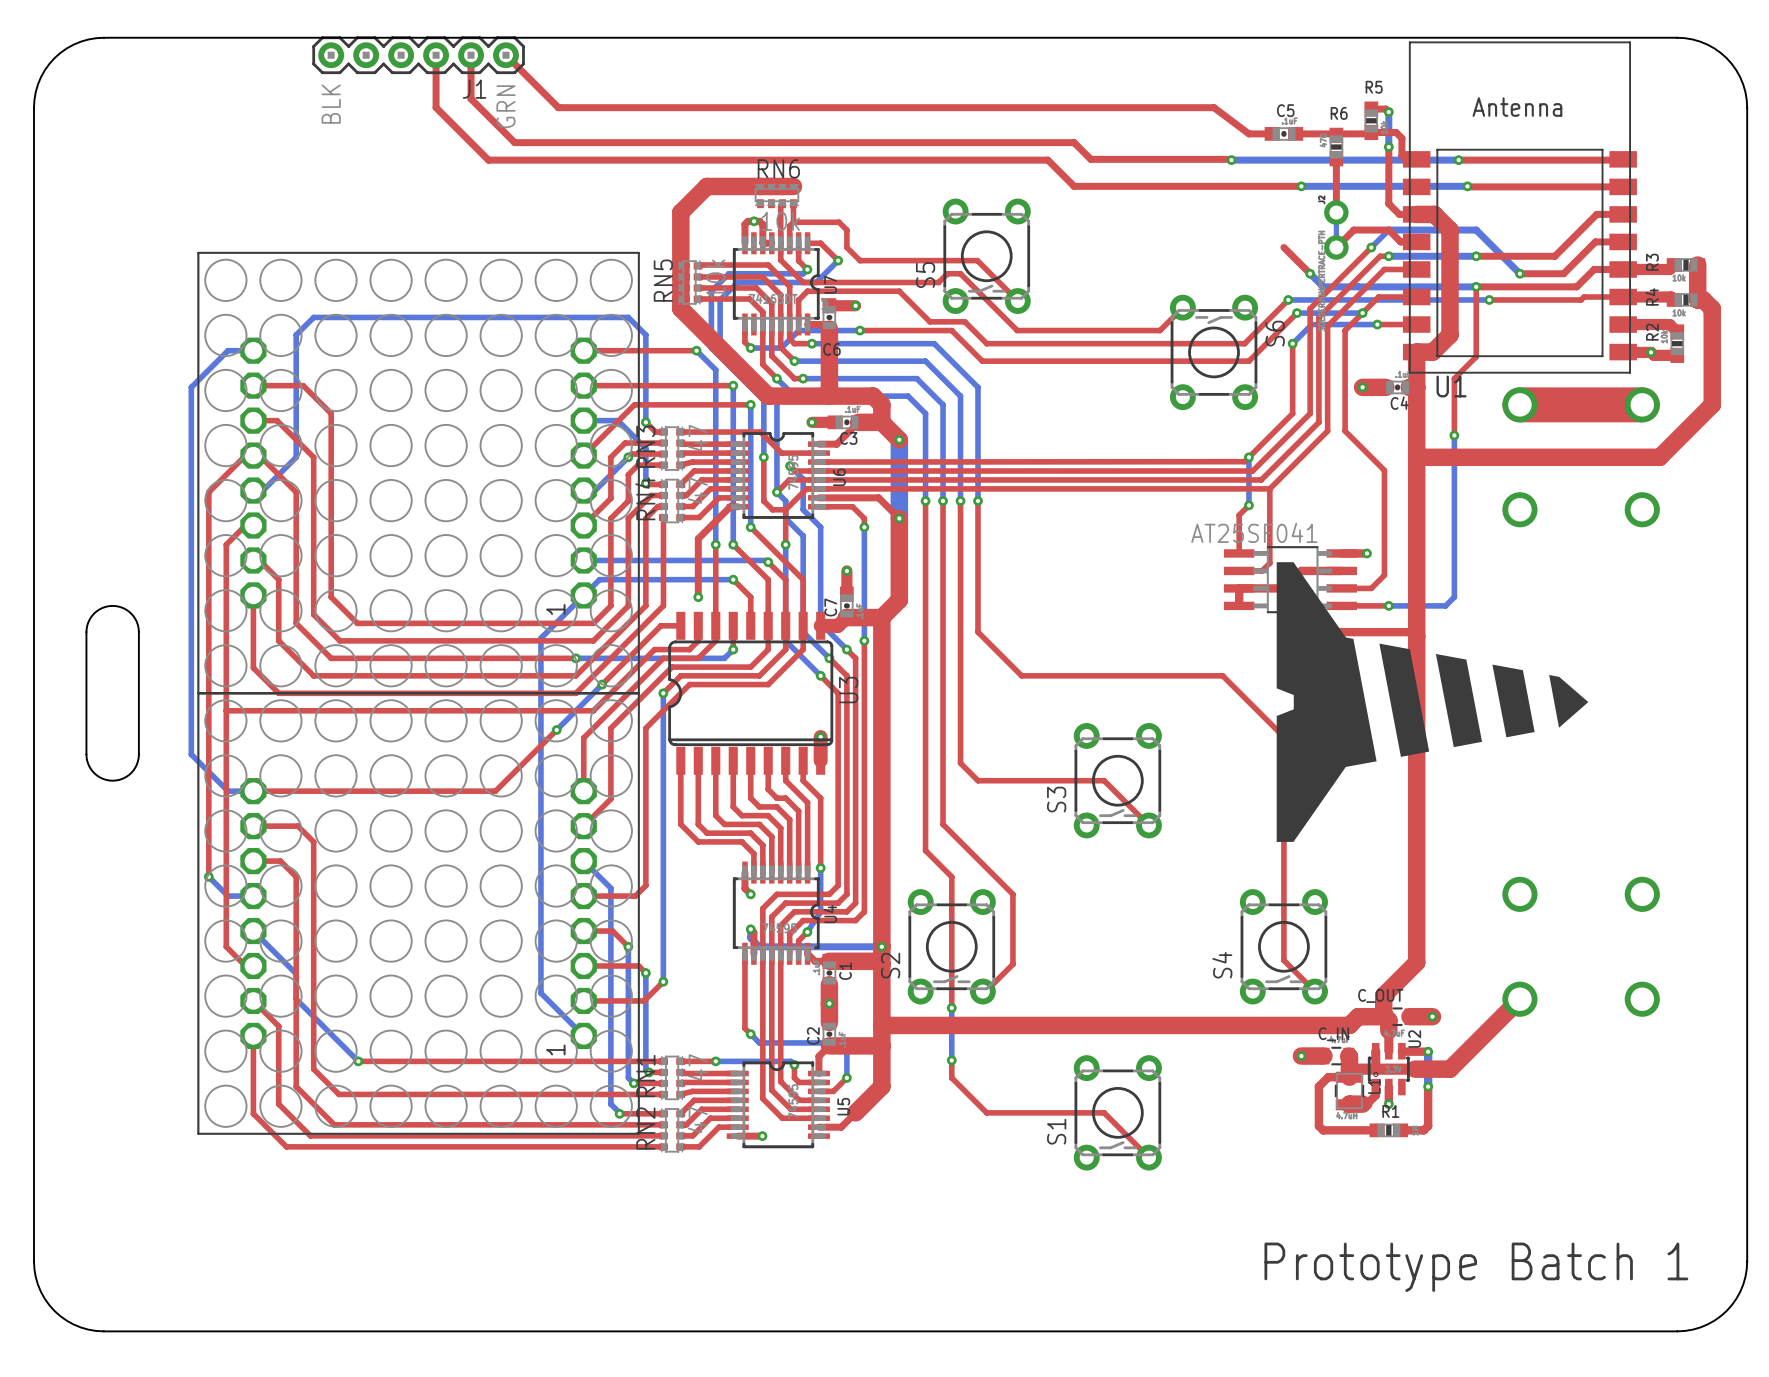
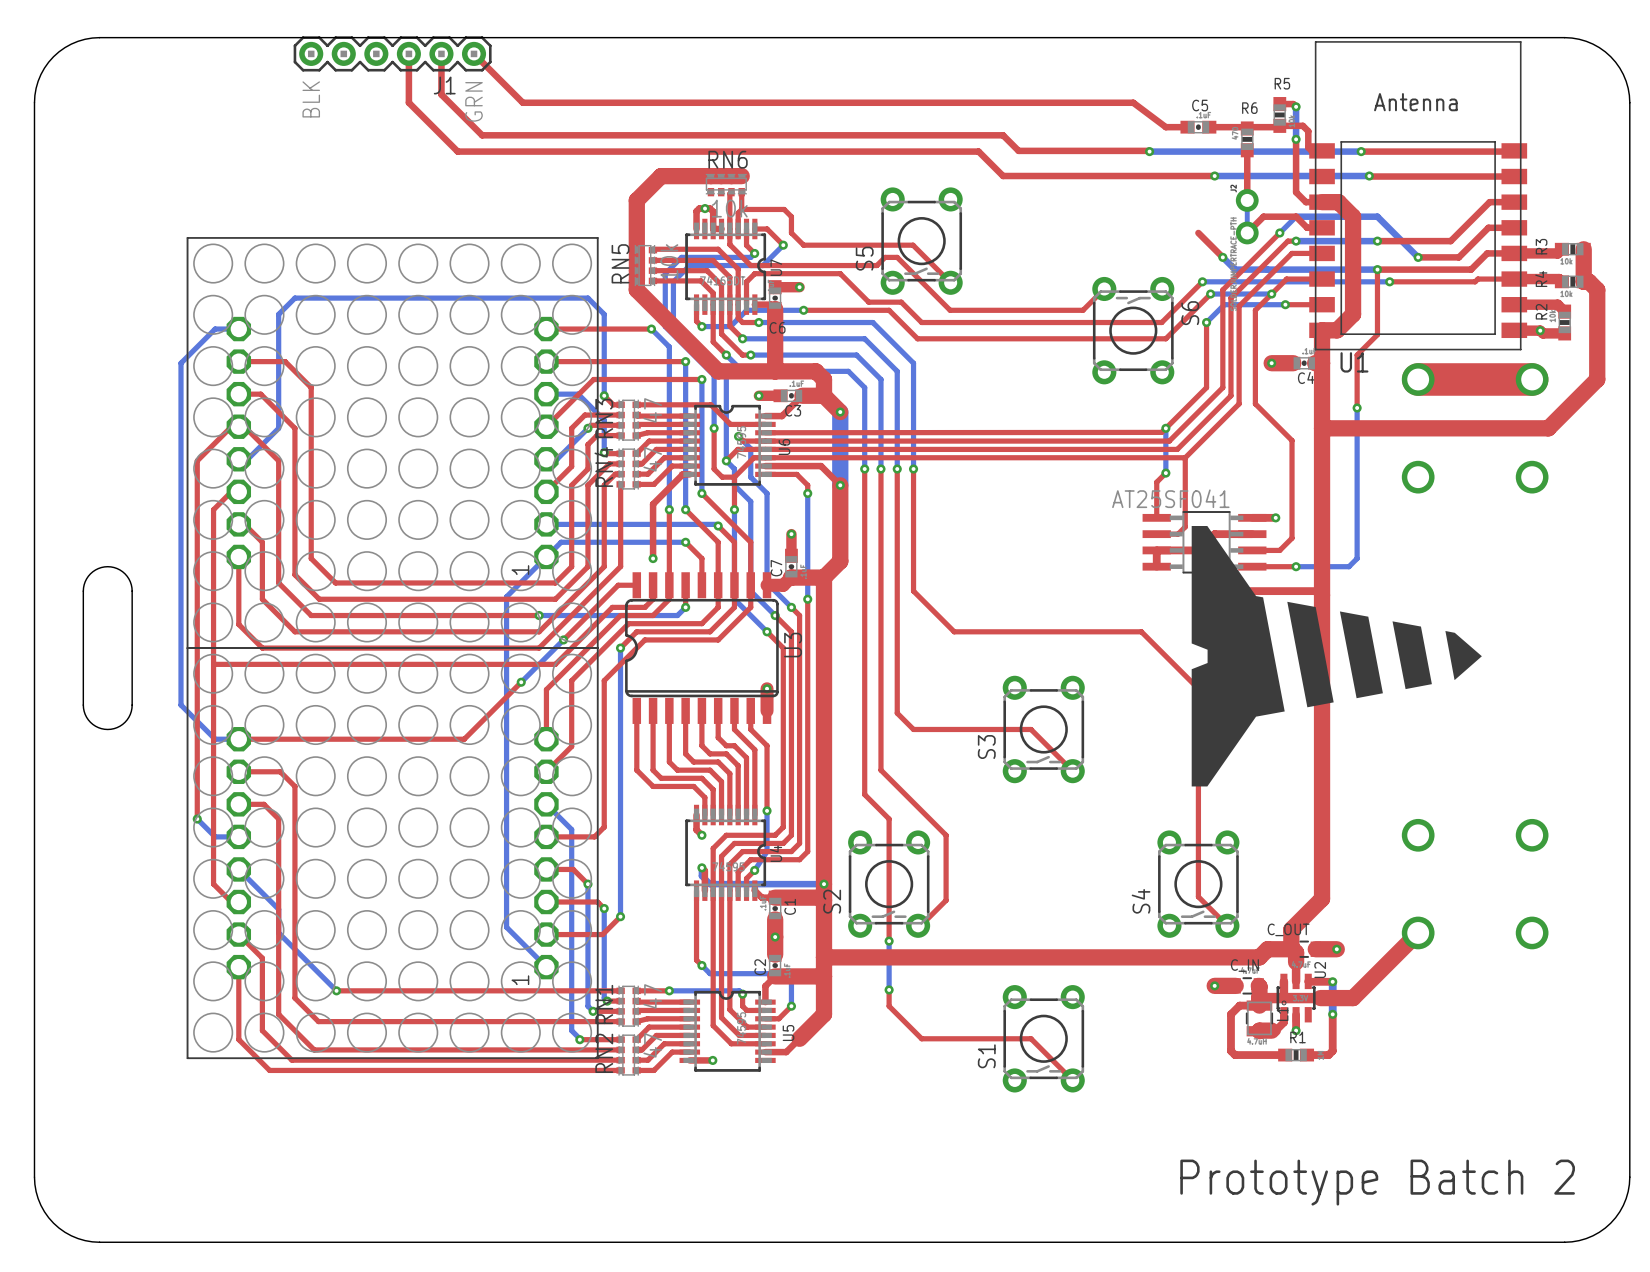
text: Prototype Batch 1 (1476, 1267) -> Prototype Batch 2 (1377, 1182)

